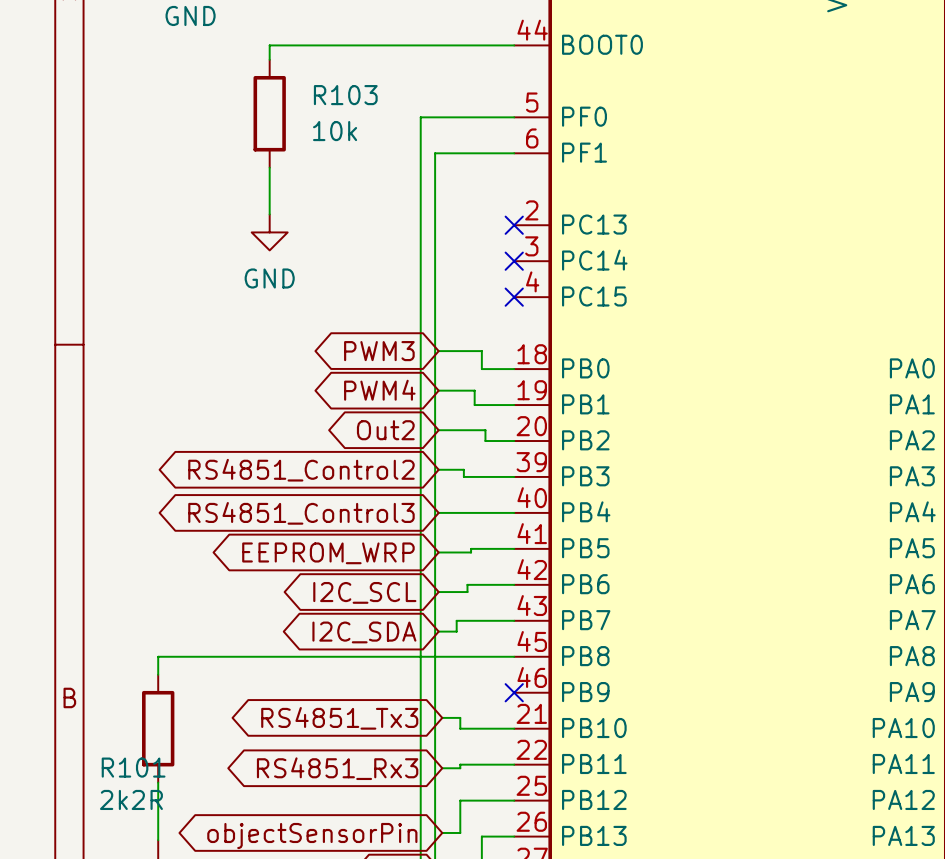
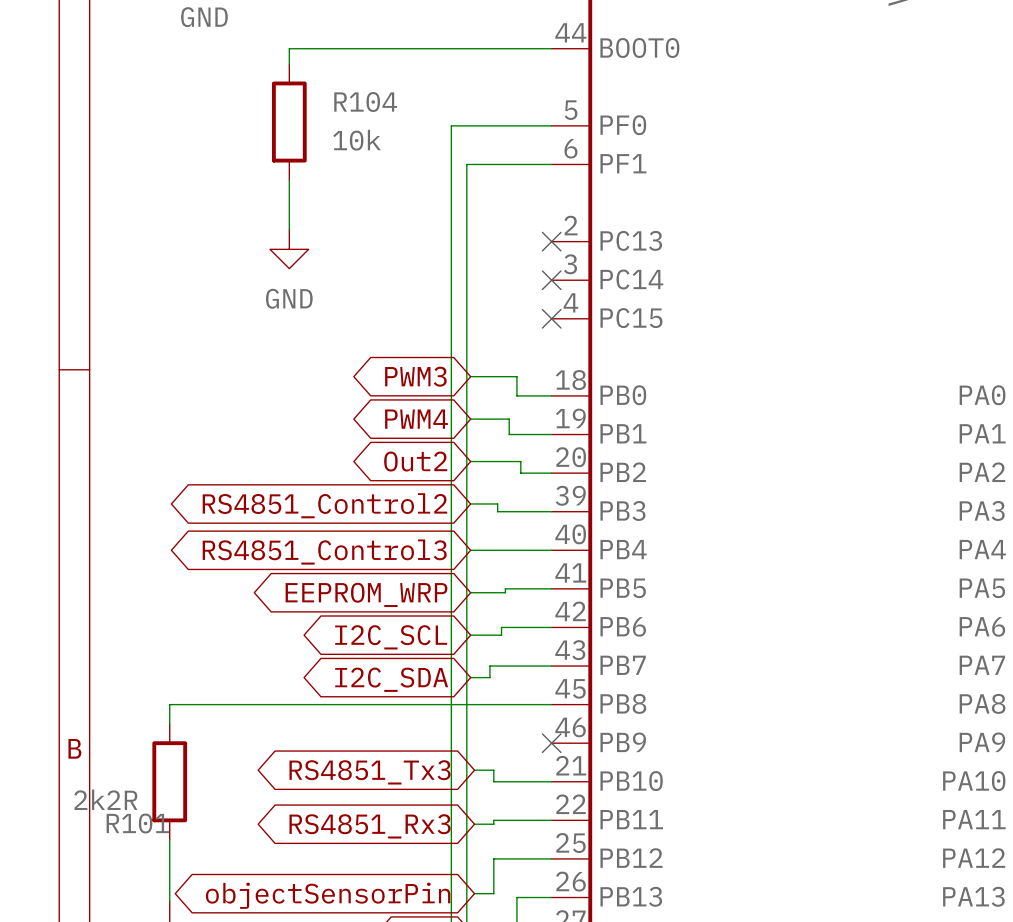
R103 name: R103 (345, 95) -> R104 (365, 102)
R101 value position: 2k2R (131, 799) -> 2k2R (105, 799)

